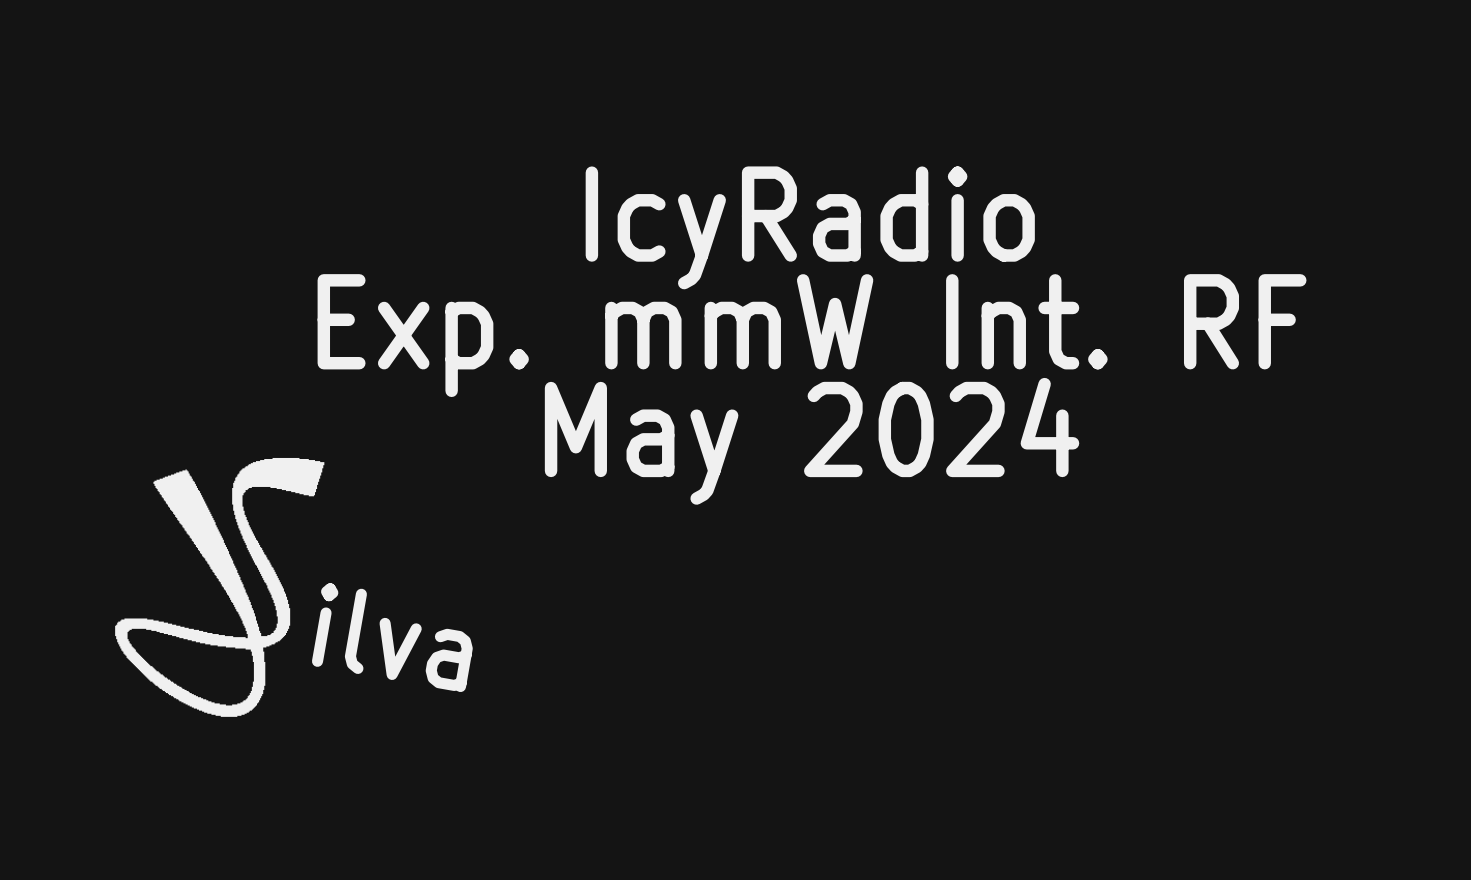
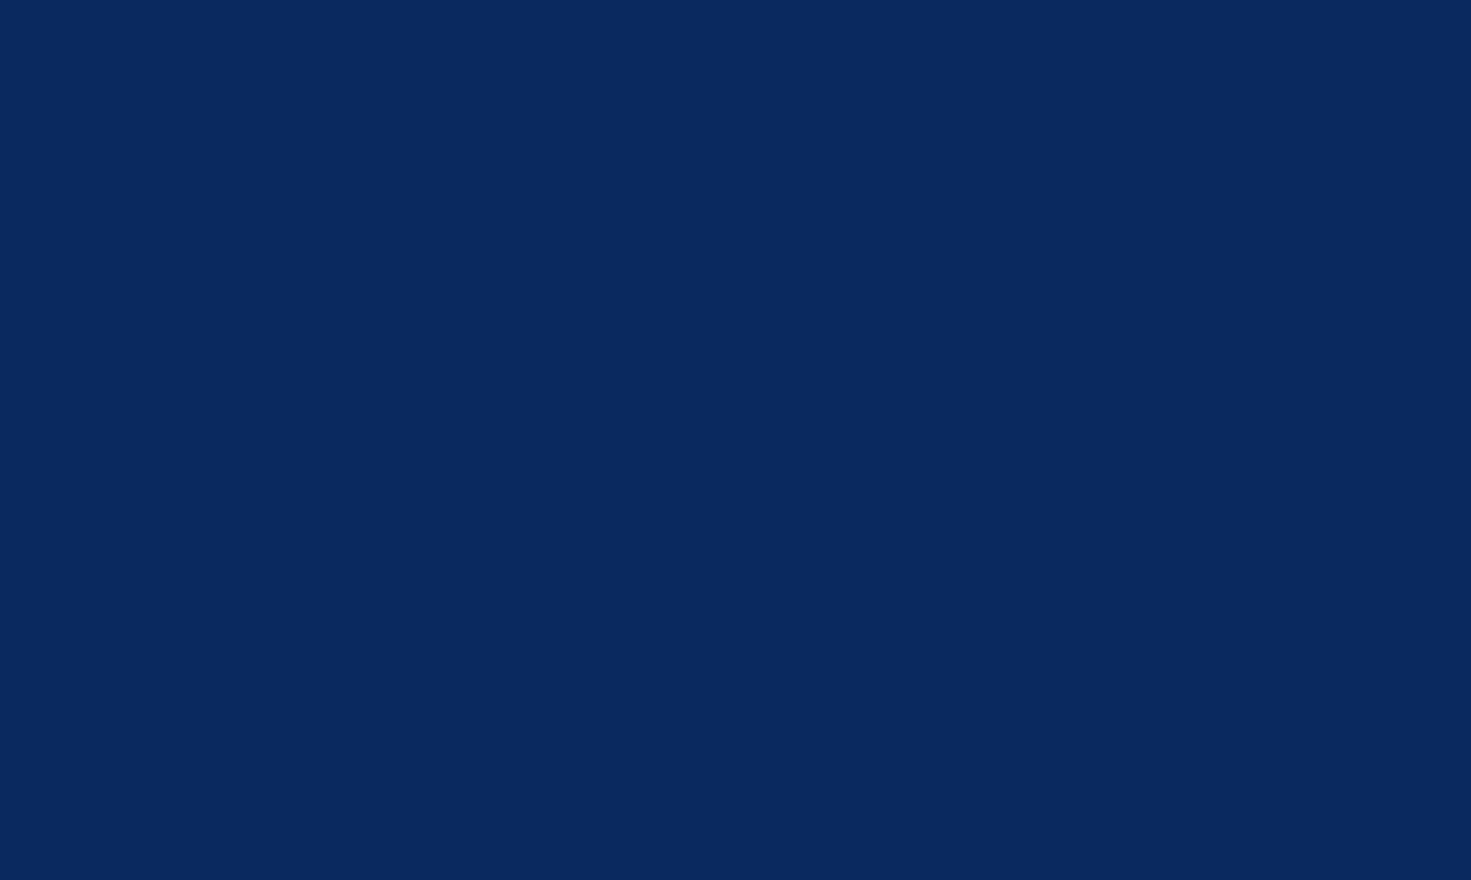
text: IcyRadio (810, 227) -> none
text: Exp. mmW Int. RF (812, 335) -> none
text: May 2024 (812, 441) -> none
drawing: [115, 457, 325, 717] -> none

